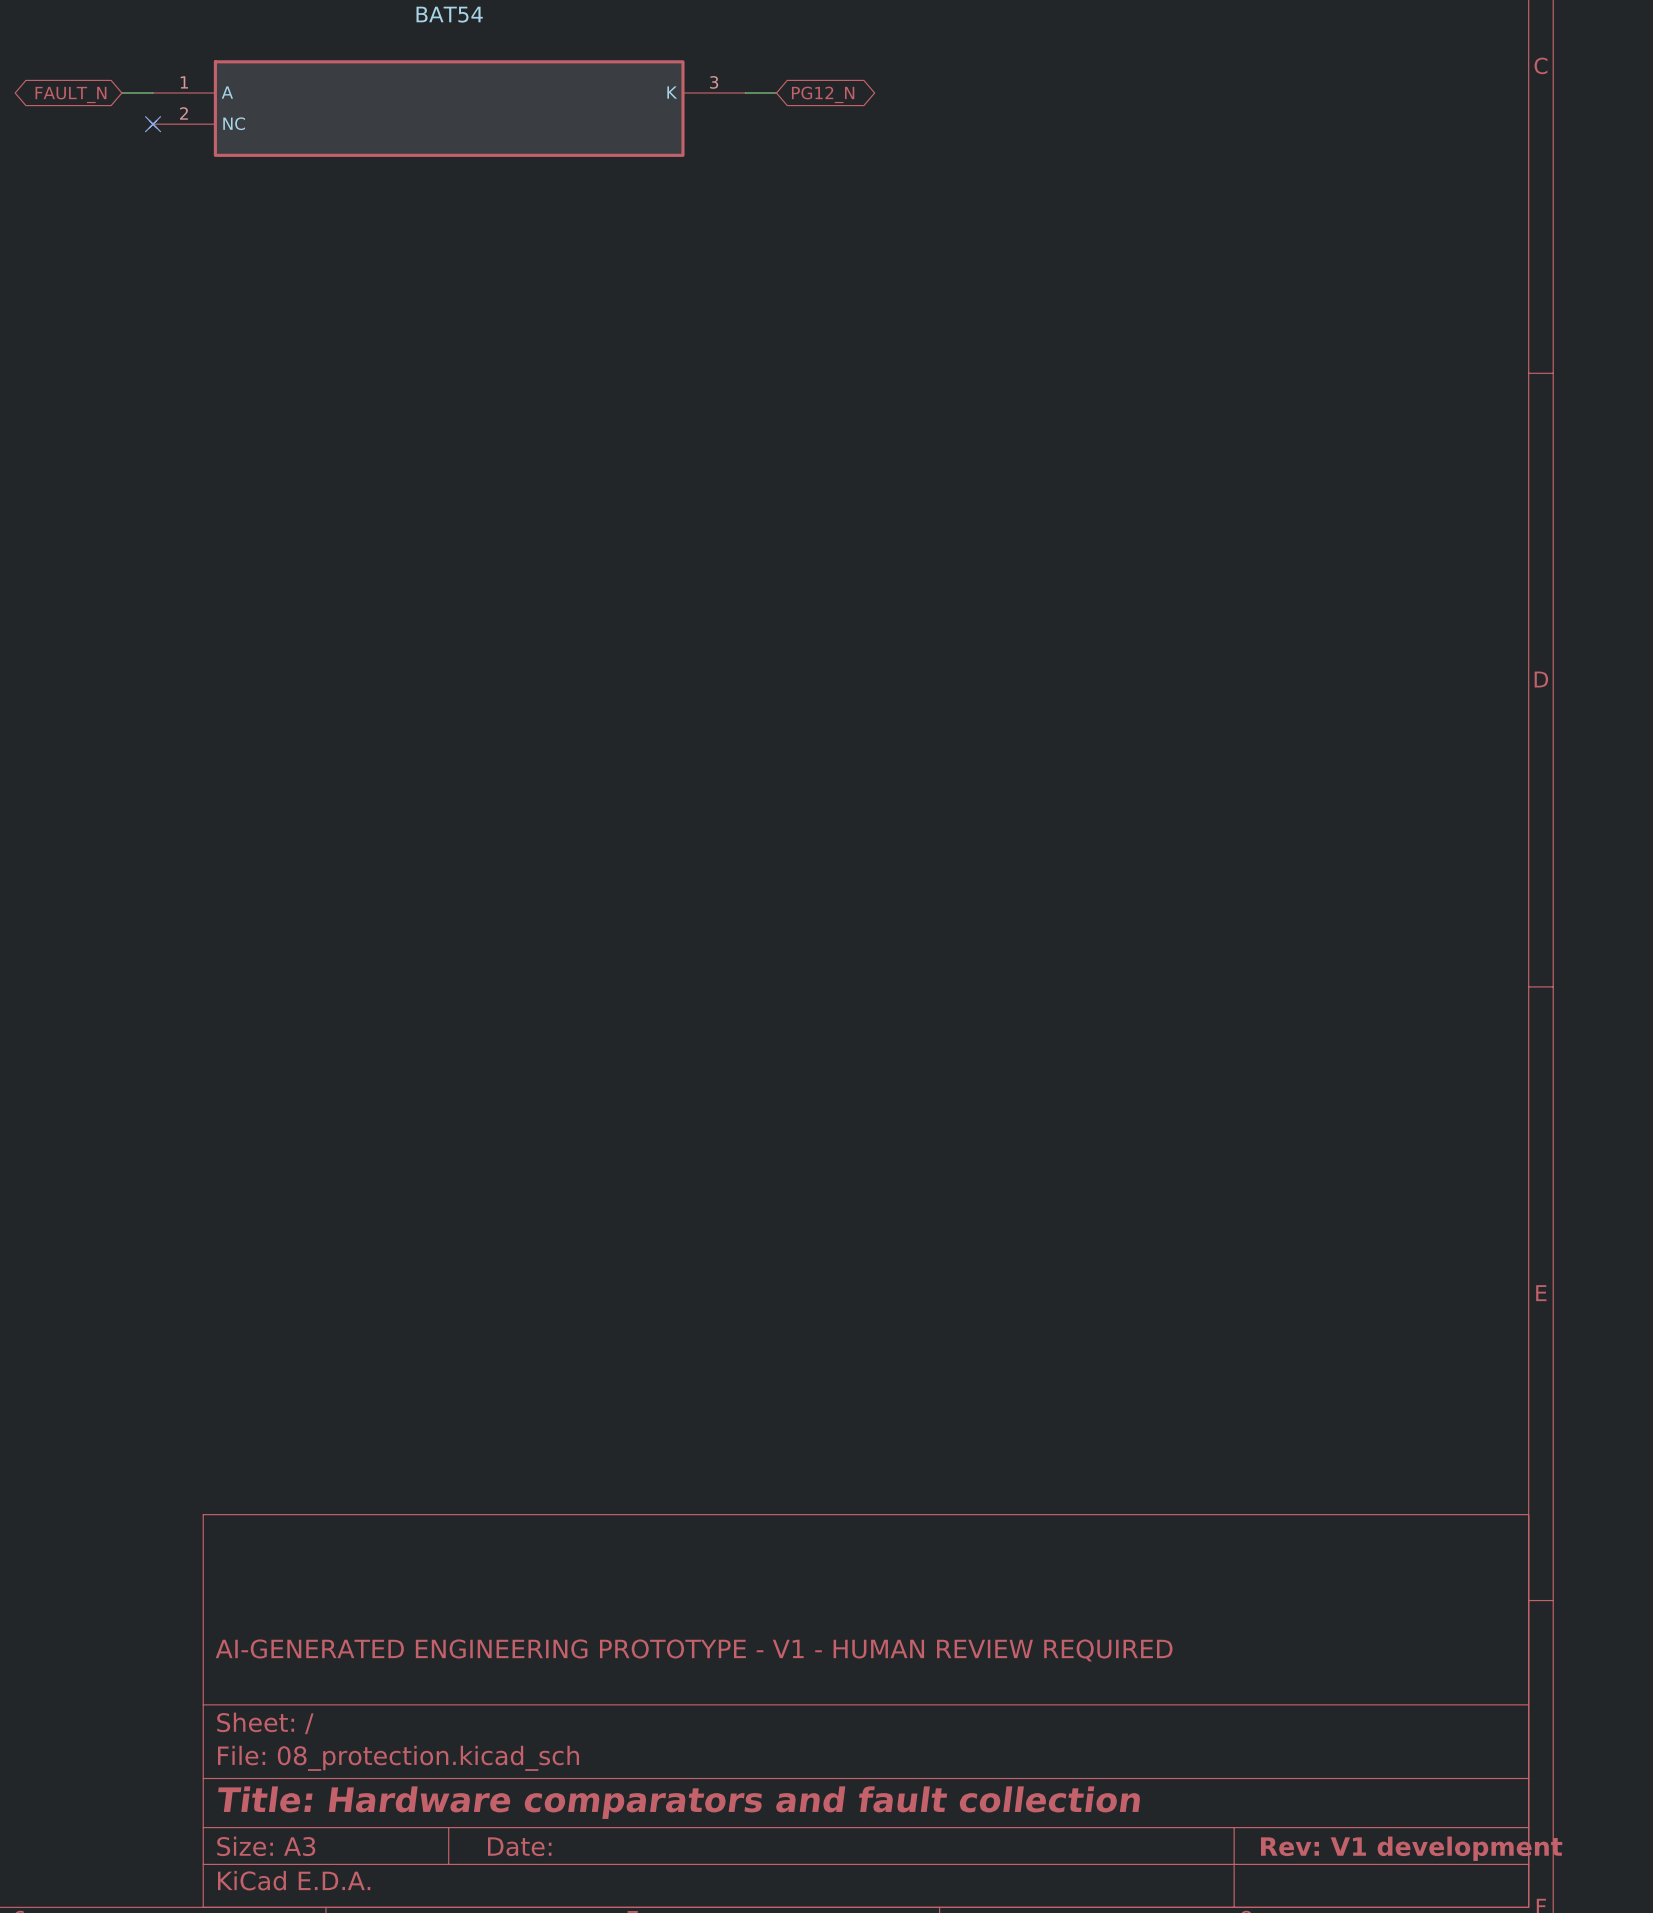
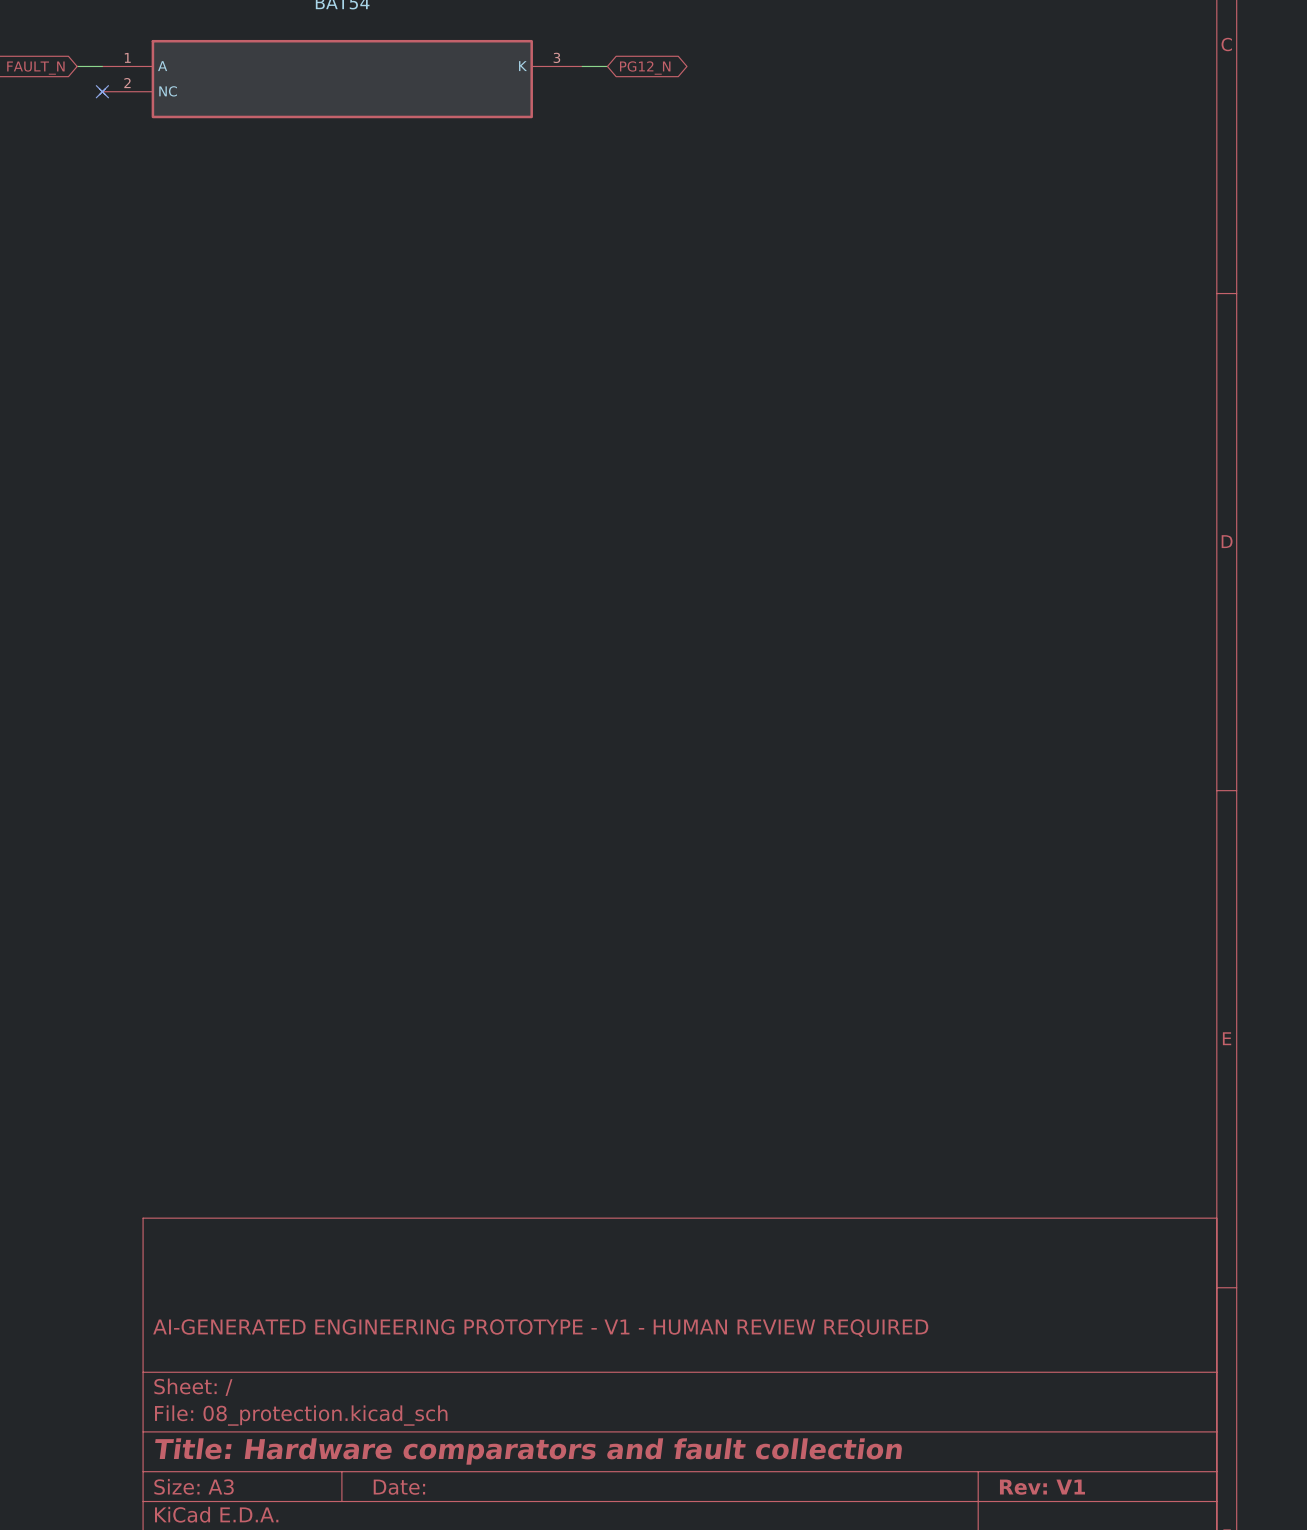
title block: Rev: V1 development (1411, 1848) -> Rev: V1 (1042, 1487)

